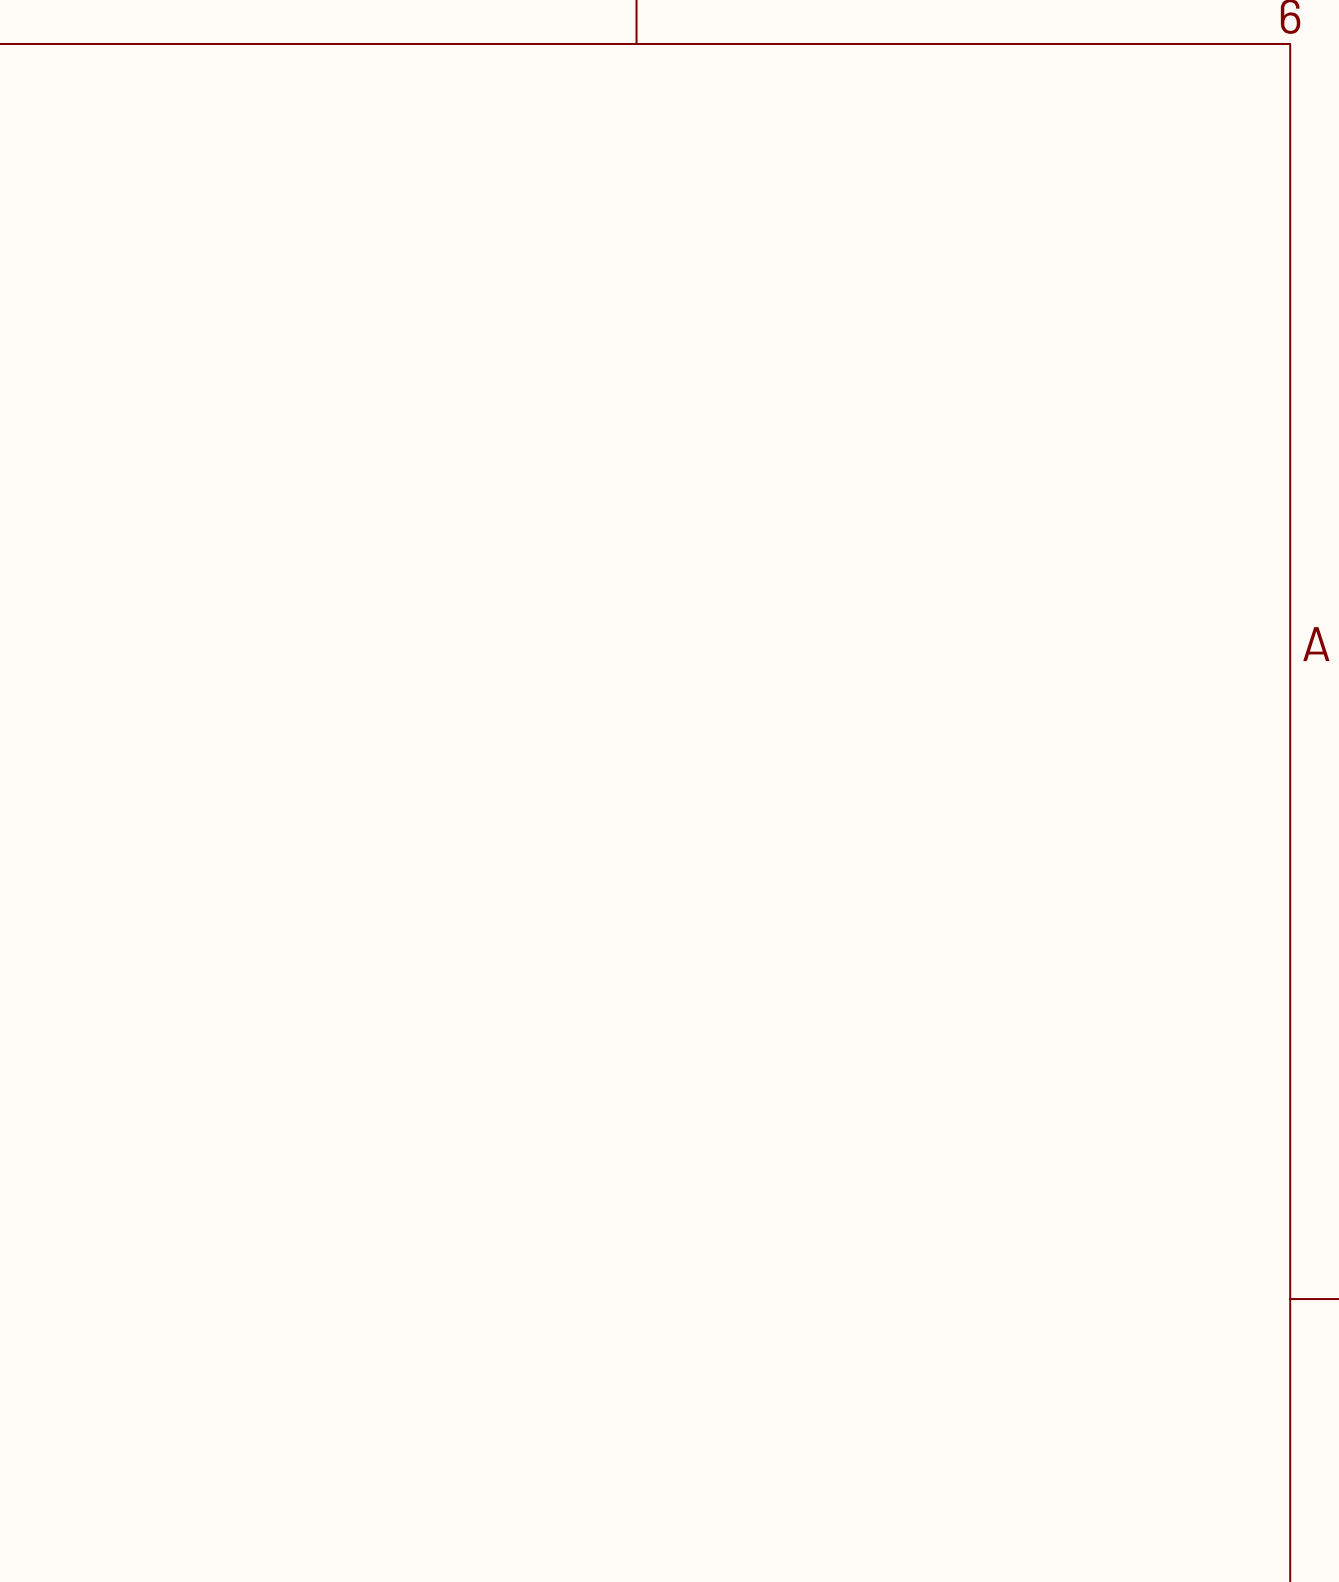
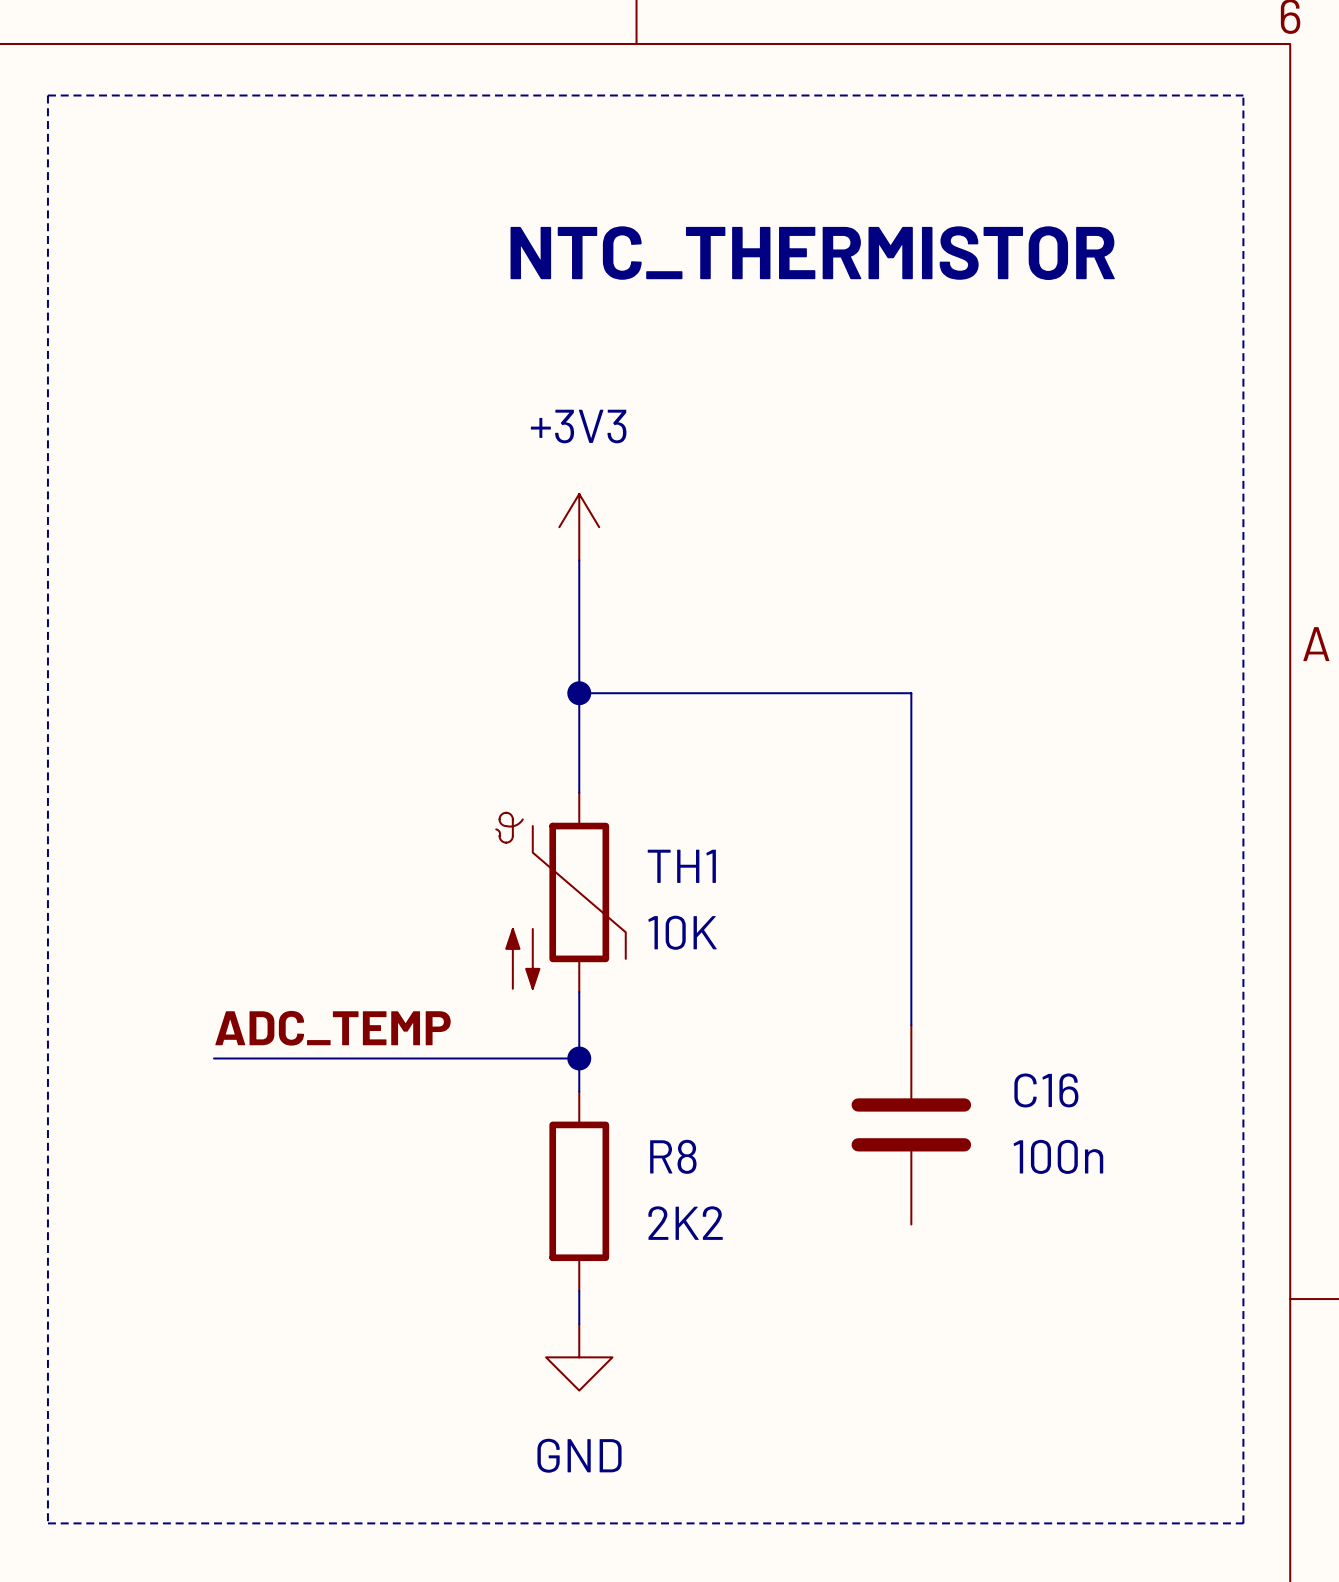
line: none -> (47, 95) (47, 1523) (1243, 1523) (1243, 95) (47, 95)
text: none -> NTC_THERMISTOR (812, 253)
power symbol: none -> +3V3 (579, 527)
wire: none -> (579, 560) (579, 792)
wire: none -> (579, 693) (911, 693) (911, 1025)
junction: none -> (579, 693)
TH1: none -> 10K (561, 892)
wire: none -> (579, 992) (579, 1091)
label: none -> ADC_TEMP (332, 1028)
wire: none -> (213, 1058) (579, 1058)
junction: none -> (579, 1058)
C16: none -> 100n (911, 1124)
R8: none -> 2K2 (579, 1191)
wire: none -> (579, 1290) (579, 1324)
power symbol: none -> GND (579, 1357)

